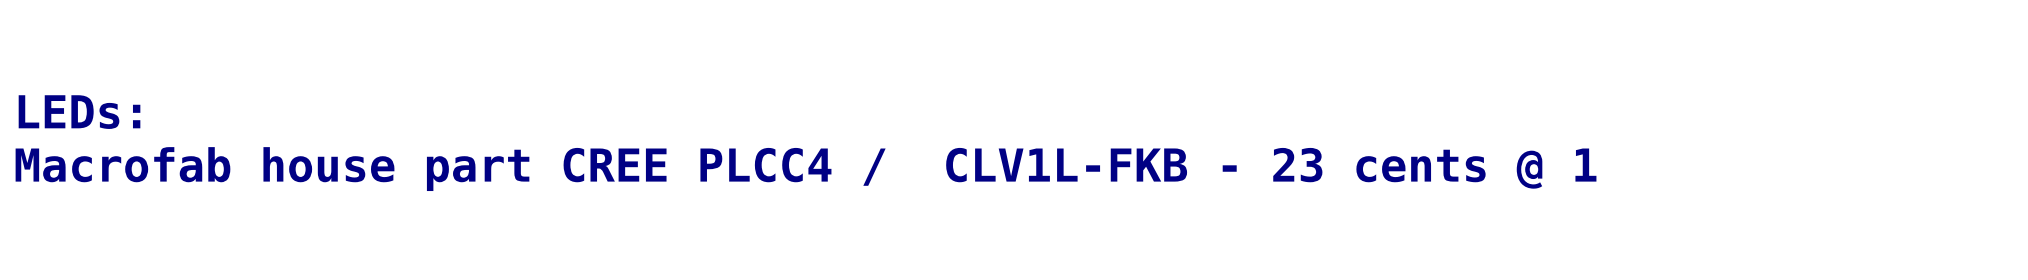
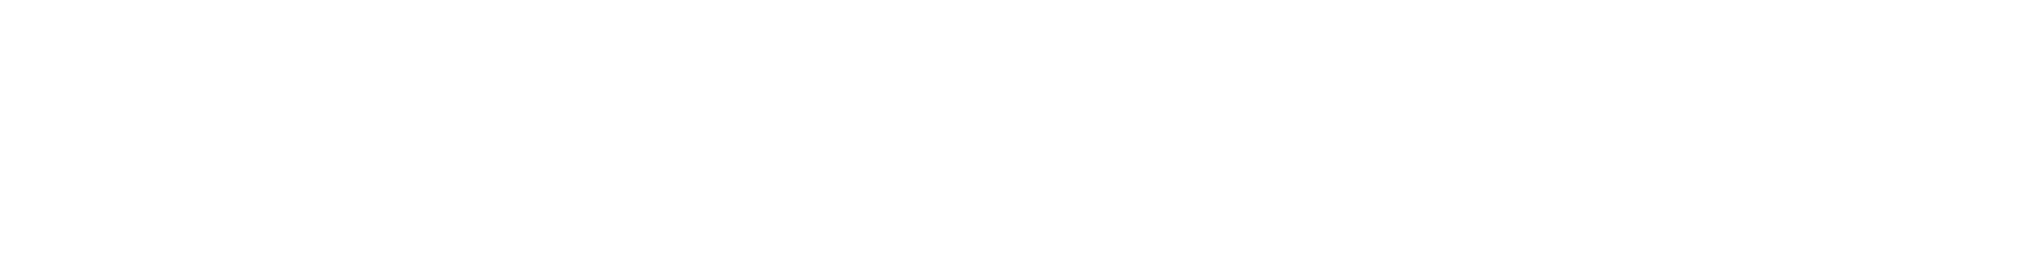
text: LEDs: (79, 112) -> none
text: Macrofab house part CREE PLCC4 / CLV1L-FKB - 23 cents @ 1 (806, 169) -> none

